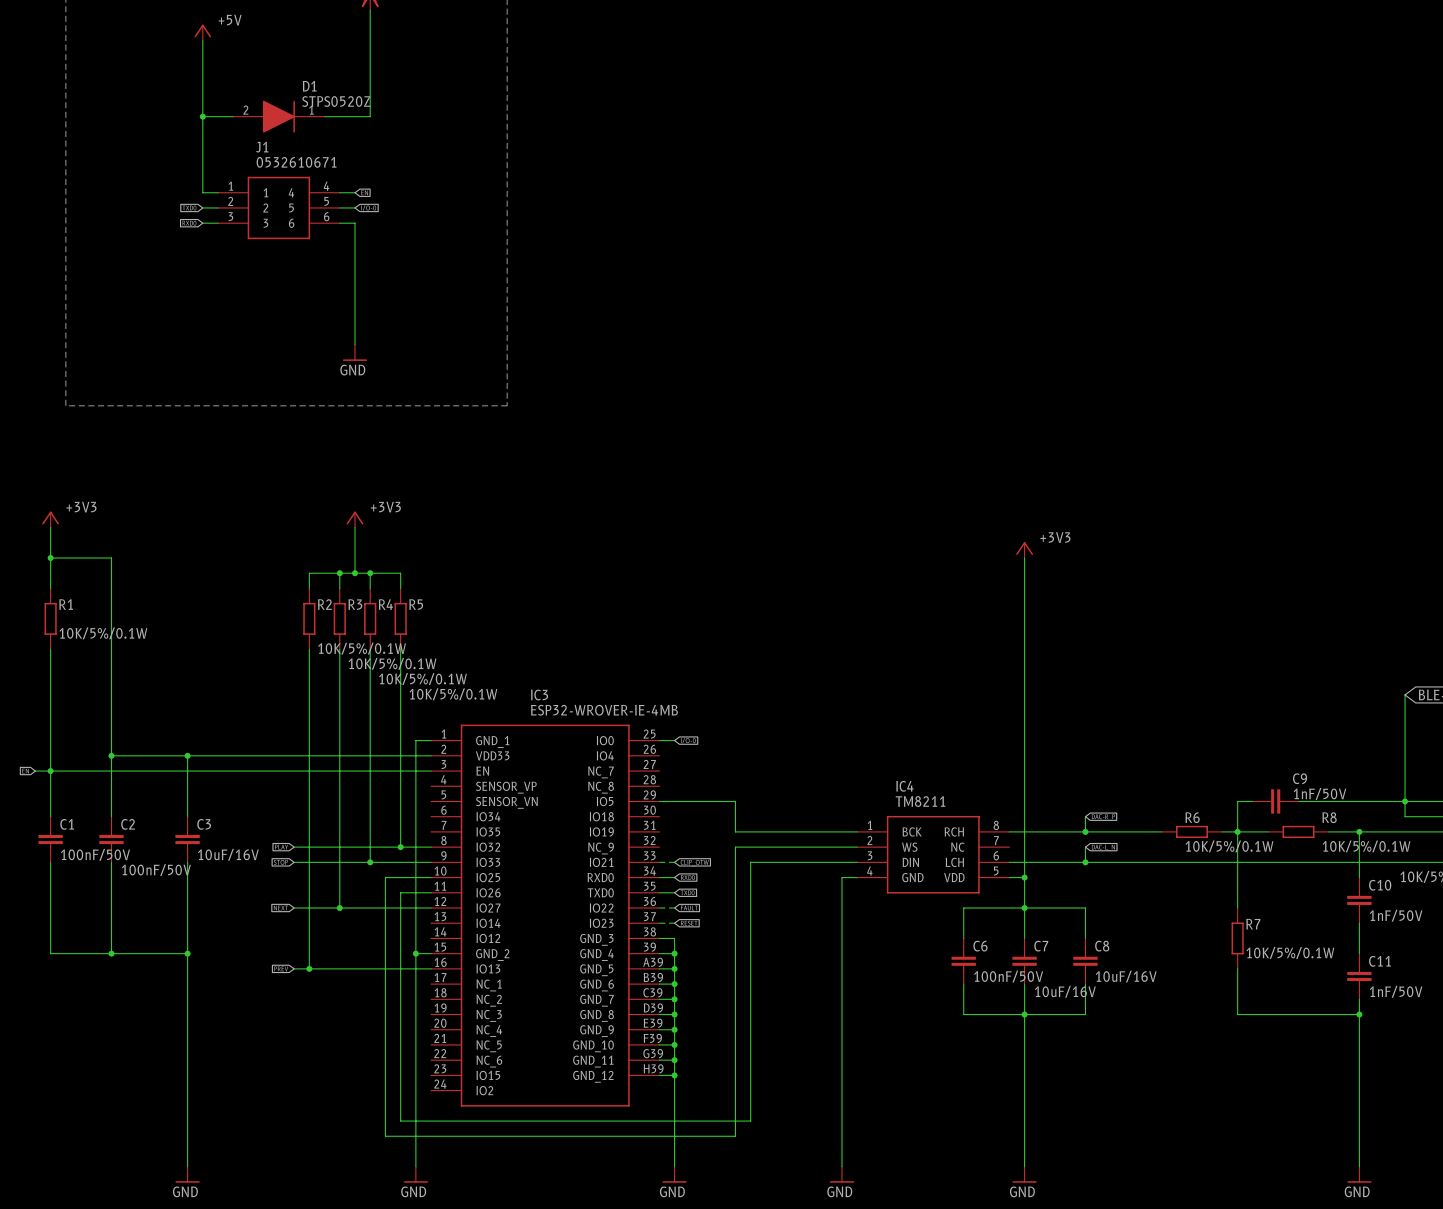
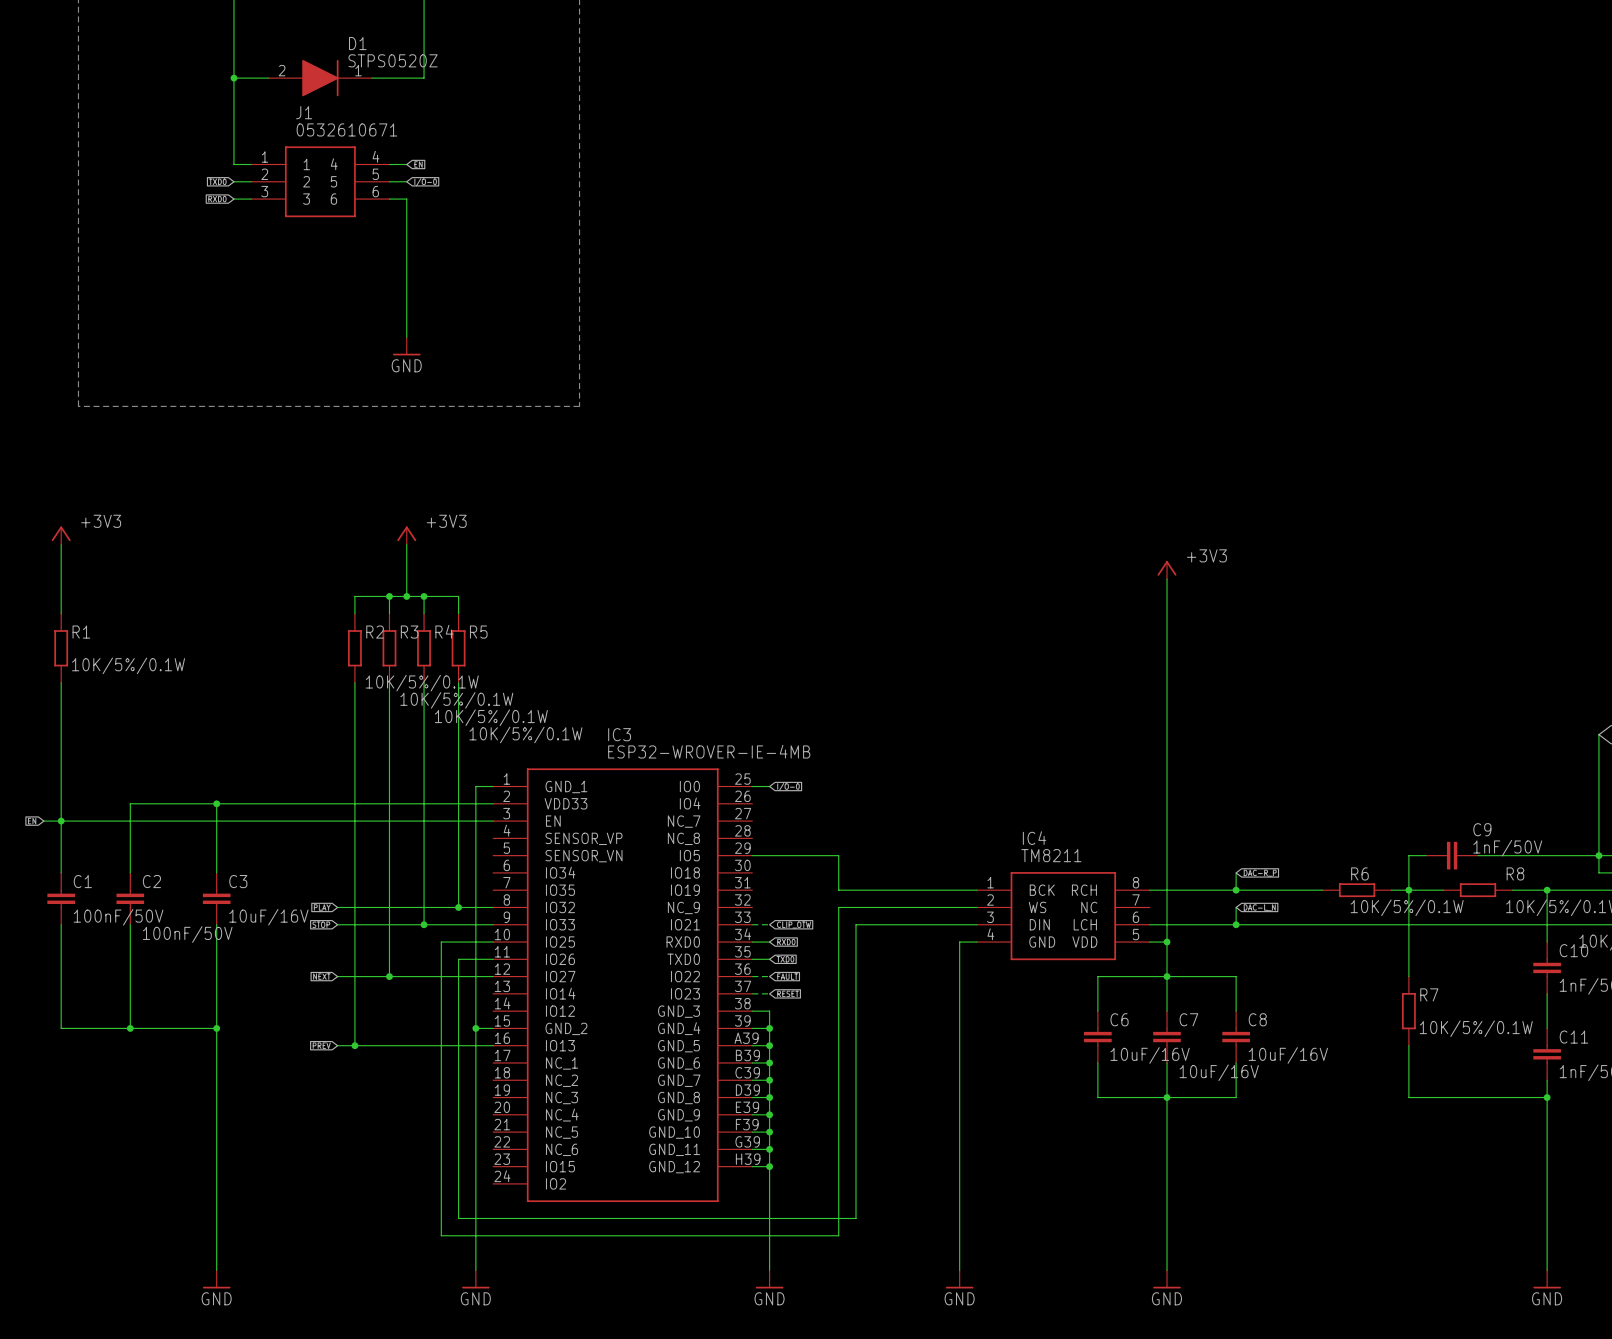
wire: (50, 557) (111, 557) (111, 755) -> none
junction: (50, 557) -> none
junction: (111, 755) -> none
C6 value: 100nF/50V (1008, 976) -> 10uF/16V (1150, 1055)

